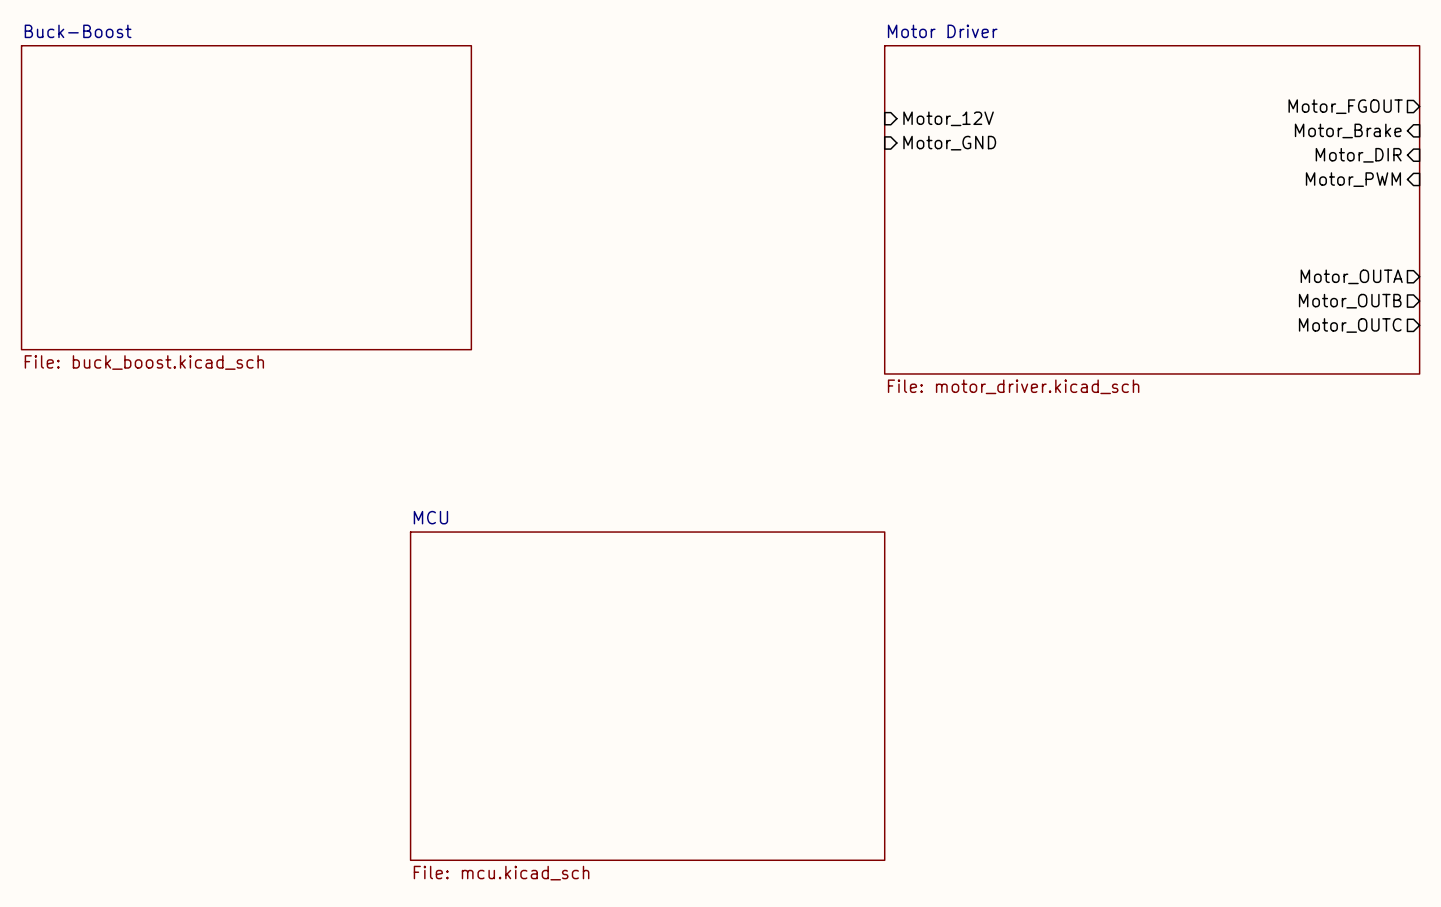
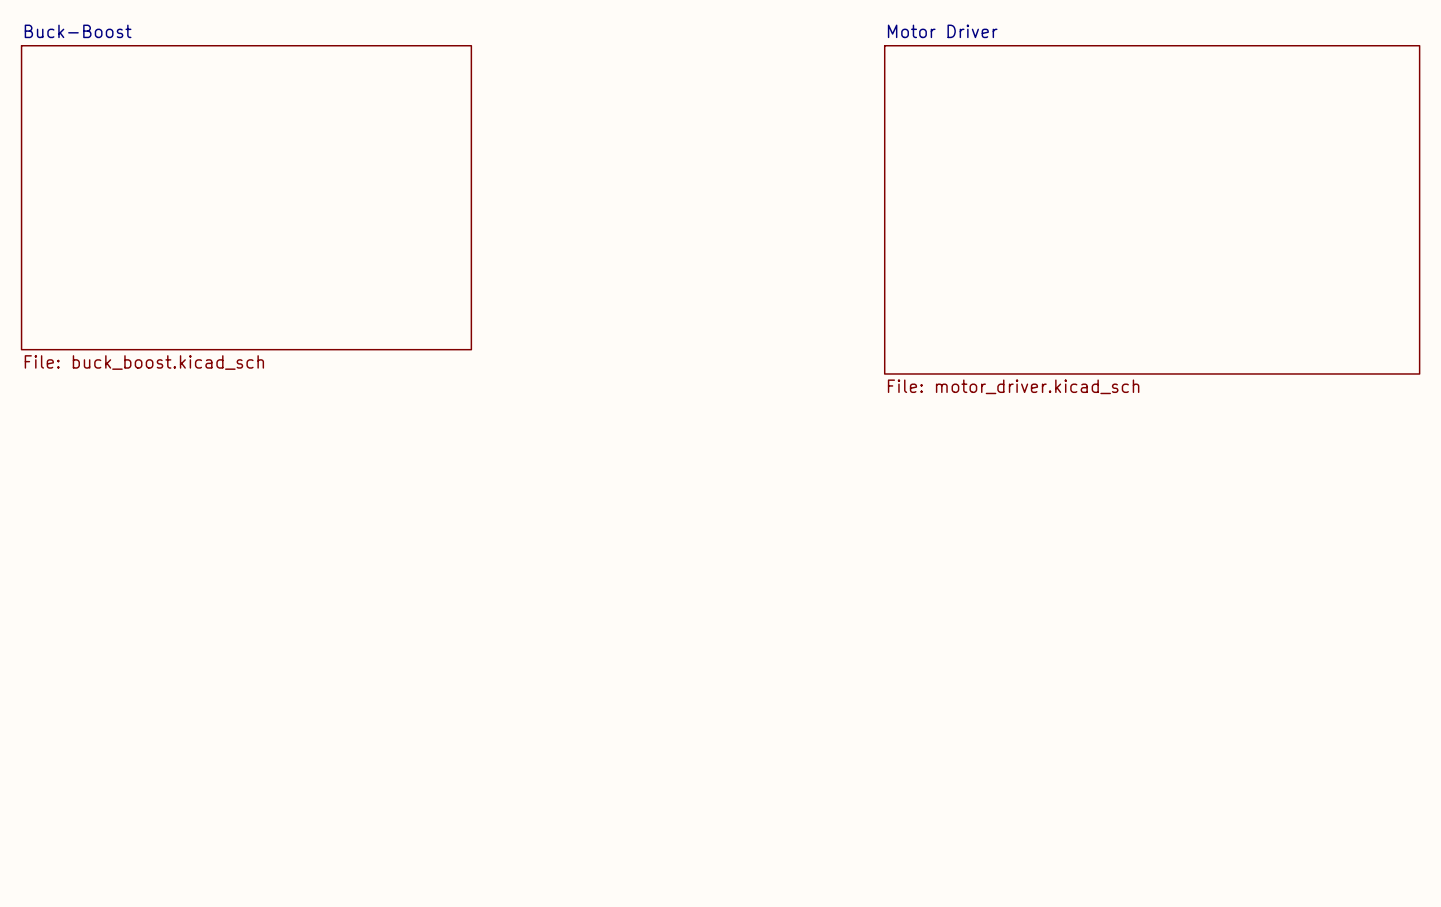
sheet pin: Motor_FGOUT (1345, 106) -> none
sheet pin: Motor_12V (948, 118) -> none
sheet pin: Motor_Brake (1348, 130) -> none
sheet pin: Motor_GND (949, 143) -> none
sheet pin: Motor_DIR (1358, 155) -> none
sheet pin: Motor_PWM (1353, 179) -> none
sheet pin: Motor_OUTA (1351, 276) -> none
sheet pin: Motor_OUTB (1350, 301) -> none
sheet pin: Motor_OUTC (1350, 325) -> none
sheet MCU: File: mcu.kicad_sch (647, 696) -> none

